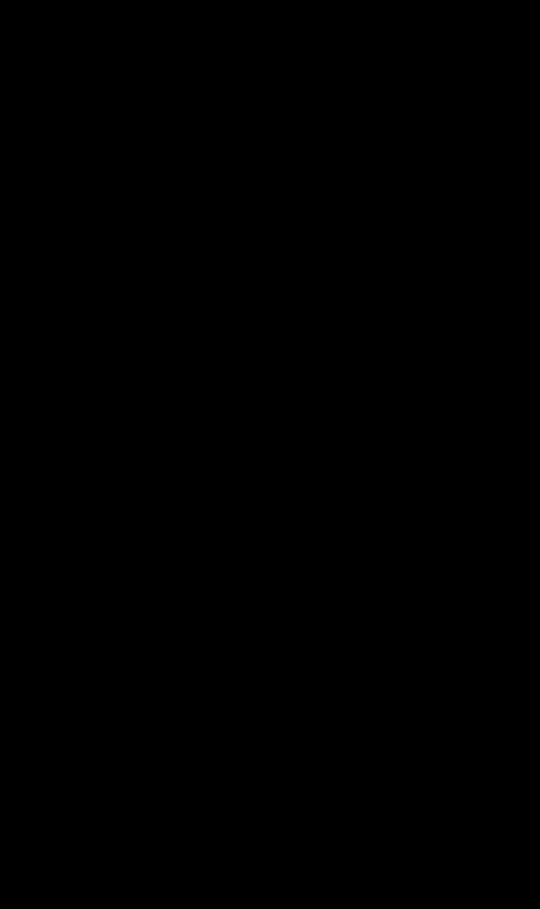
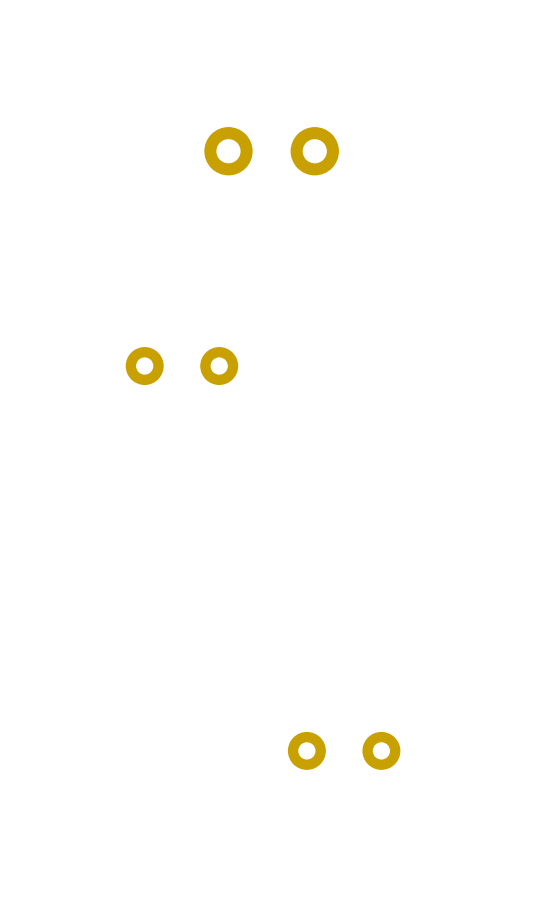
part: none -> (271, 151)
part: none -> (181, 366)
part: none -> (344, 750)

